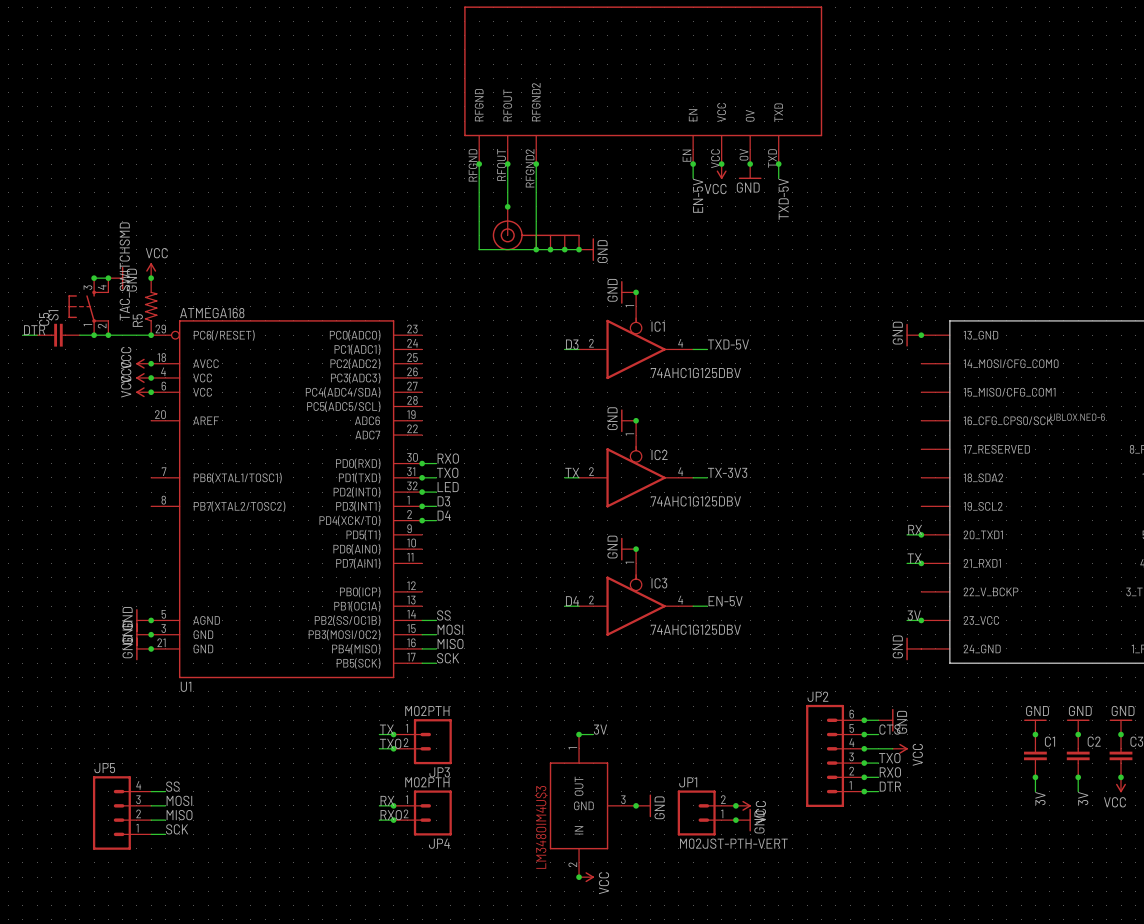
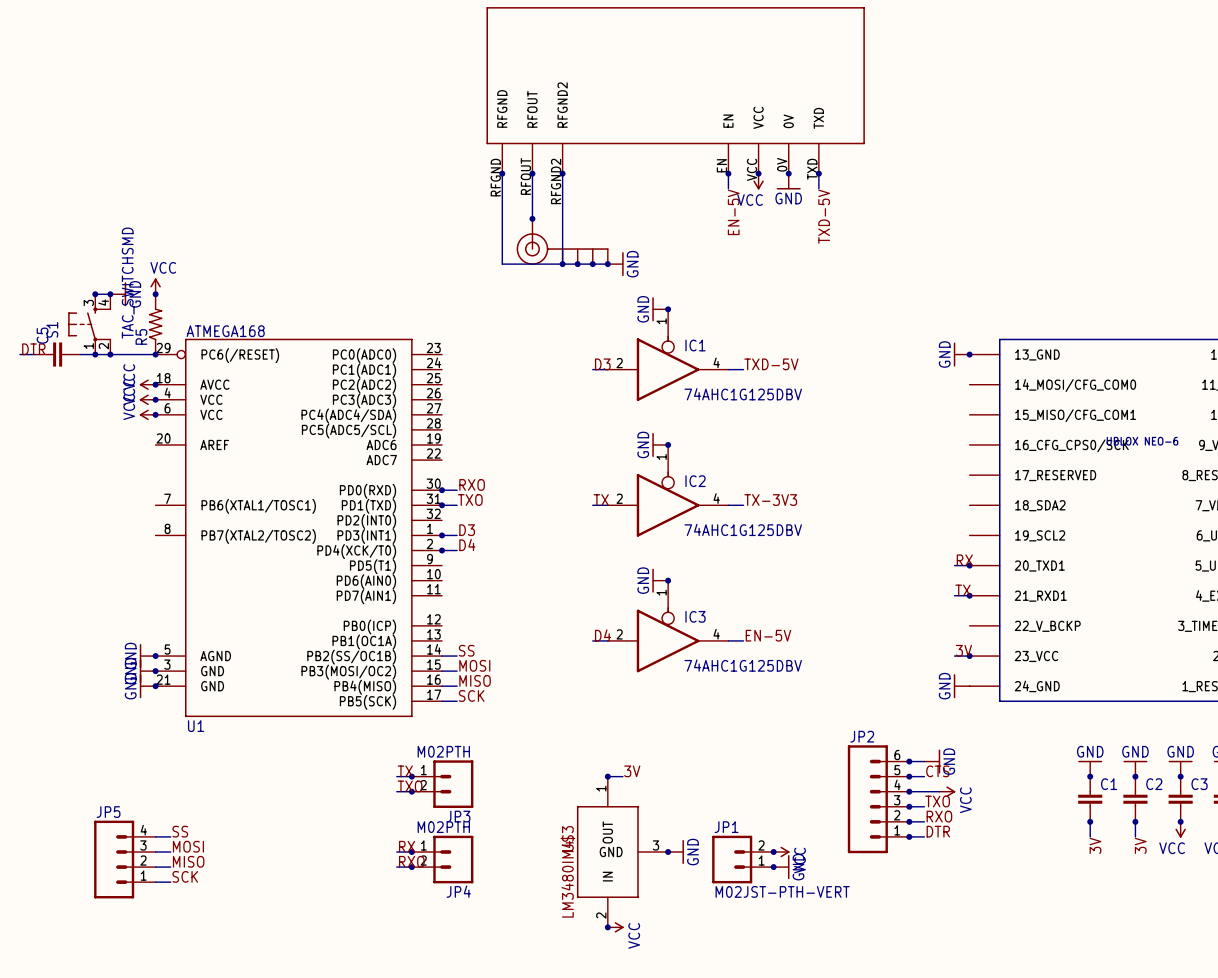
label: LED (448, 487) -> none
wire: (422, 492) (436, 492) -> none
junction: (422, 492) -> none

